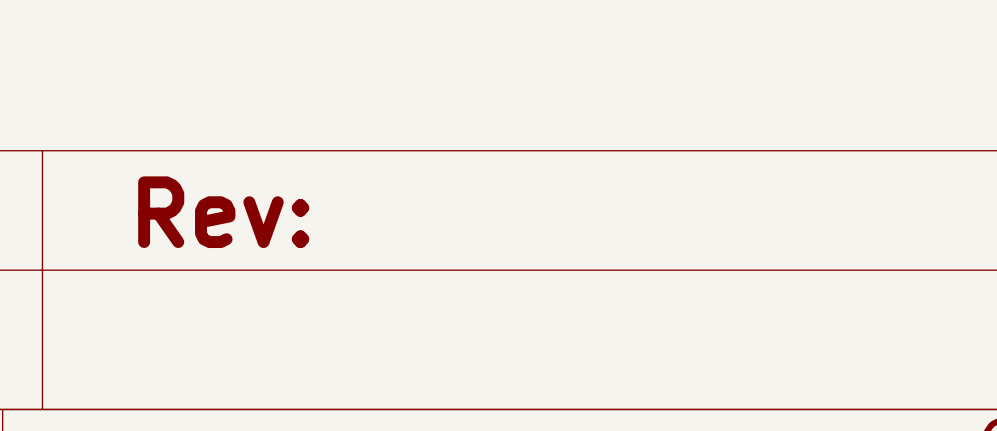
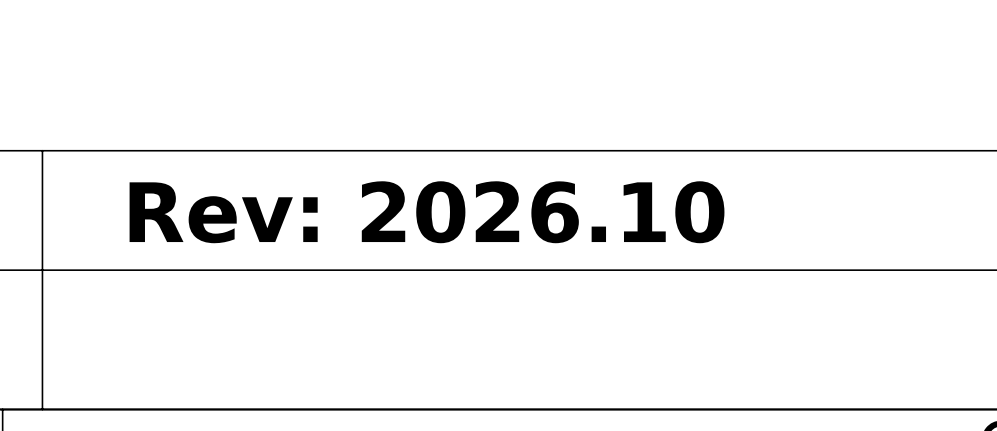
title block: Rev: (223, 212) -> Rev: 2026.10 (427, 212)

